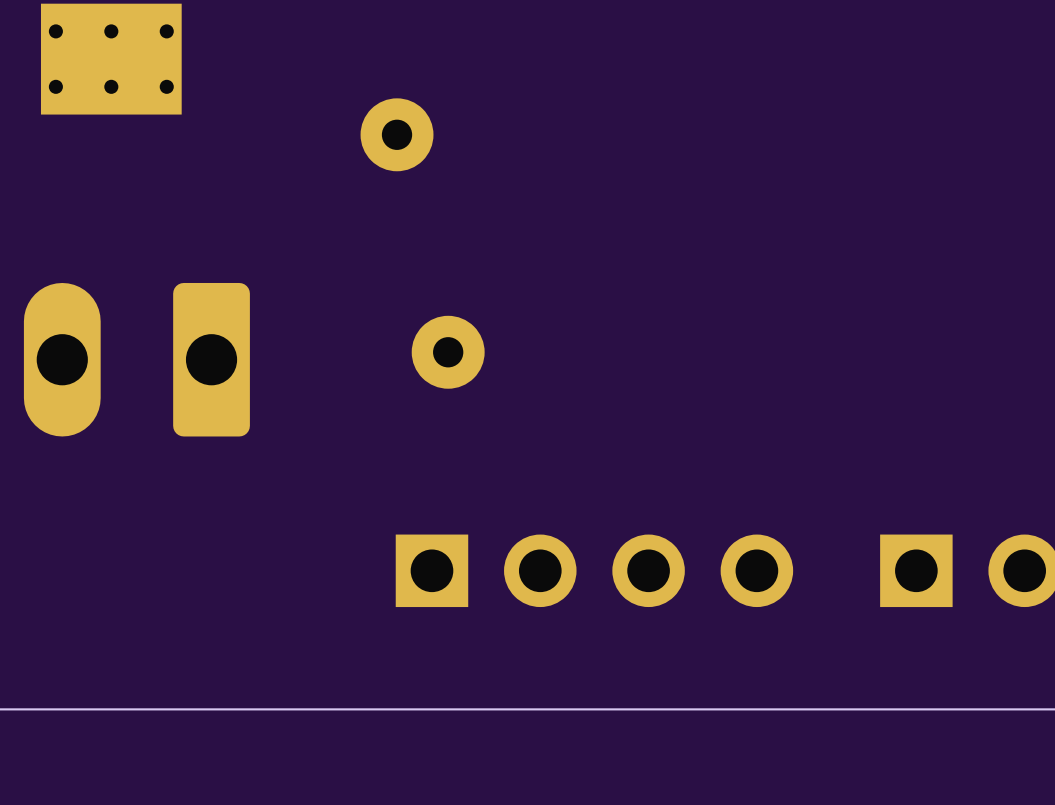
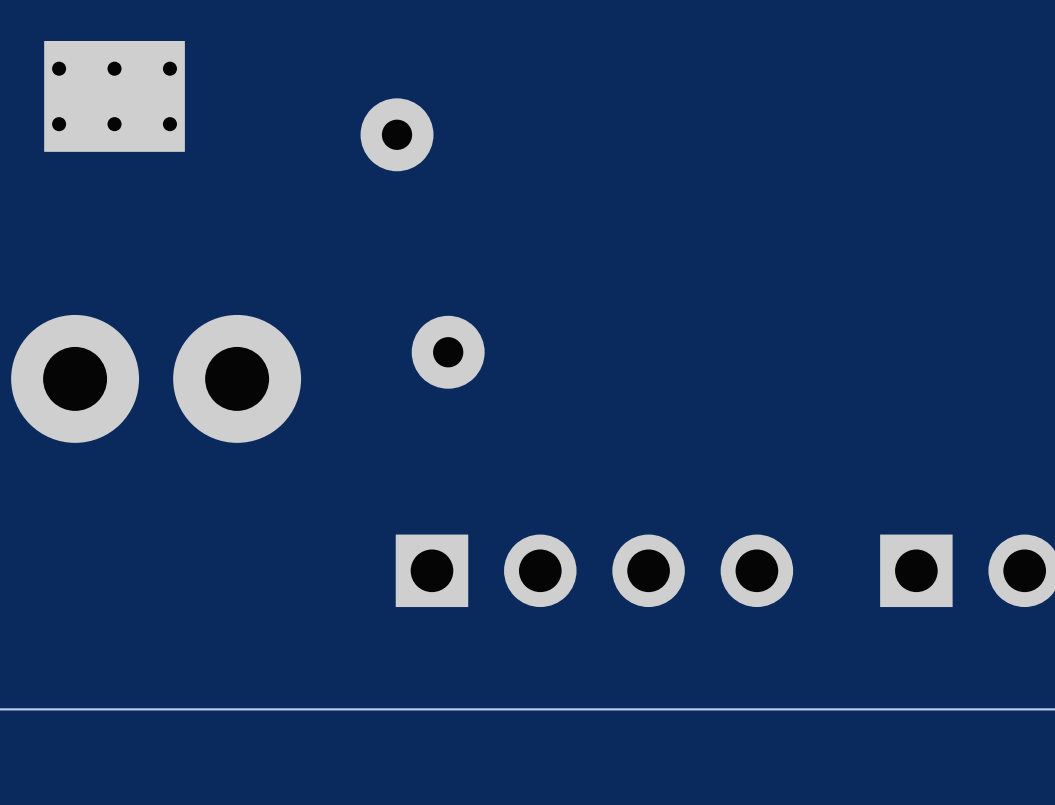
part position: (111, 59) -> (114, 96)
part footprint: [23, 282, 250, 437] -> [11, 314, 302, 443]

